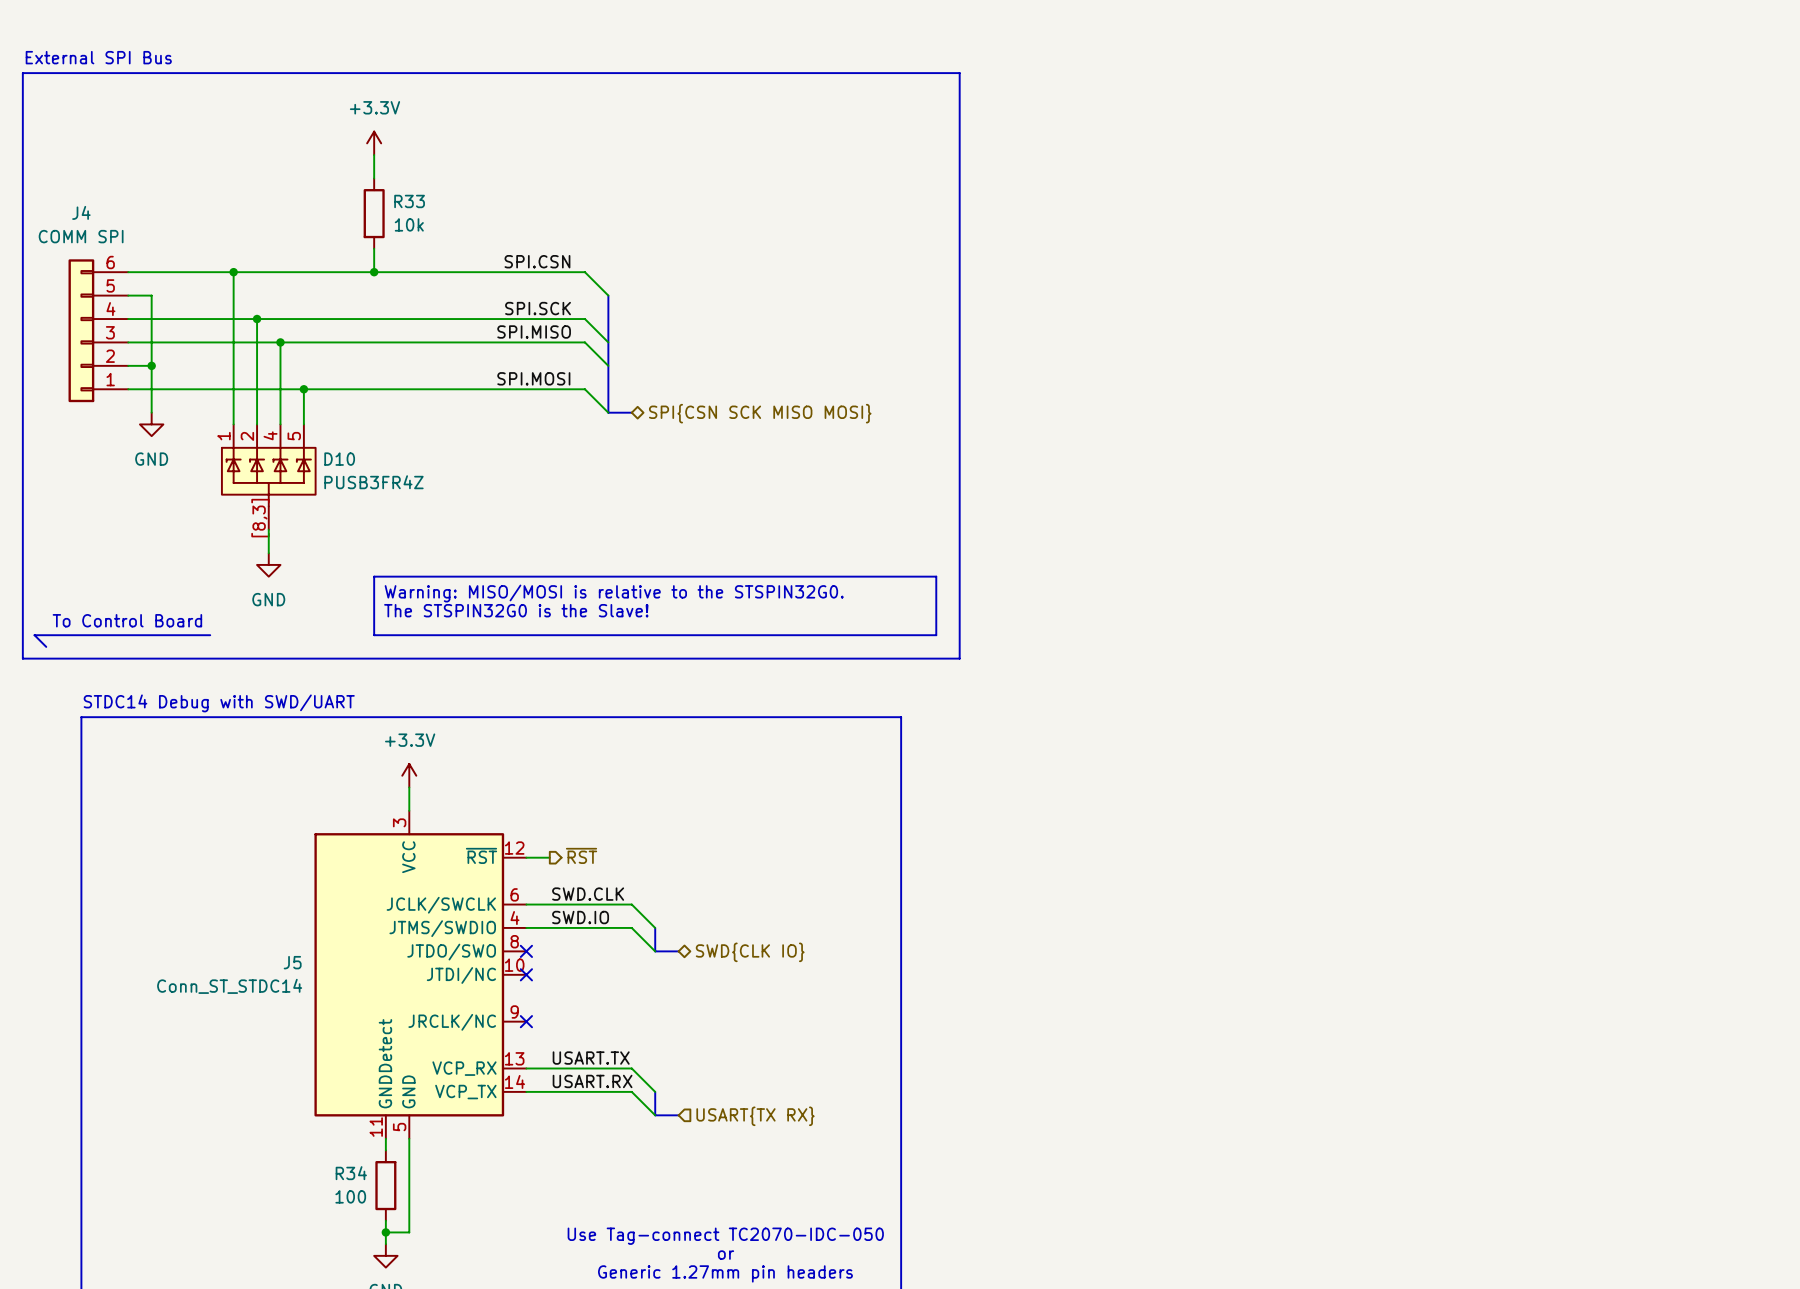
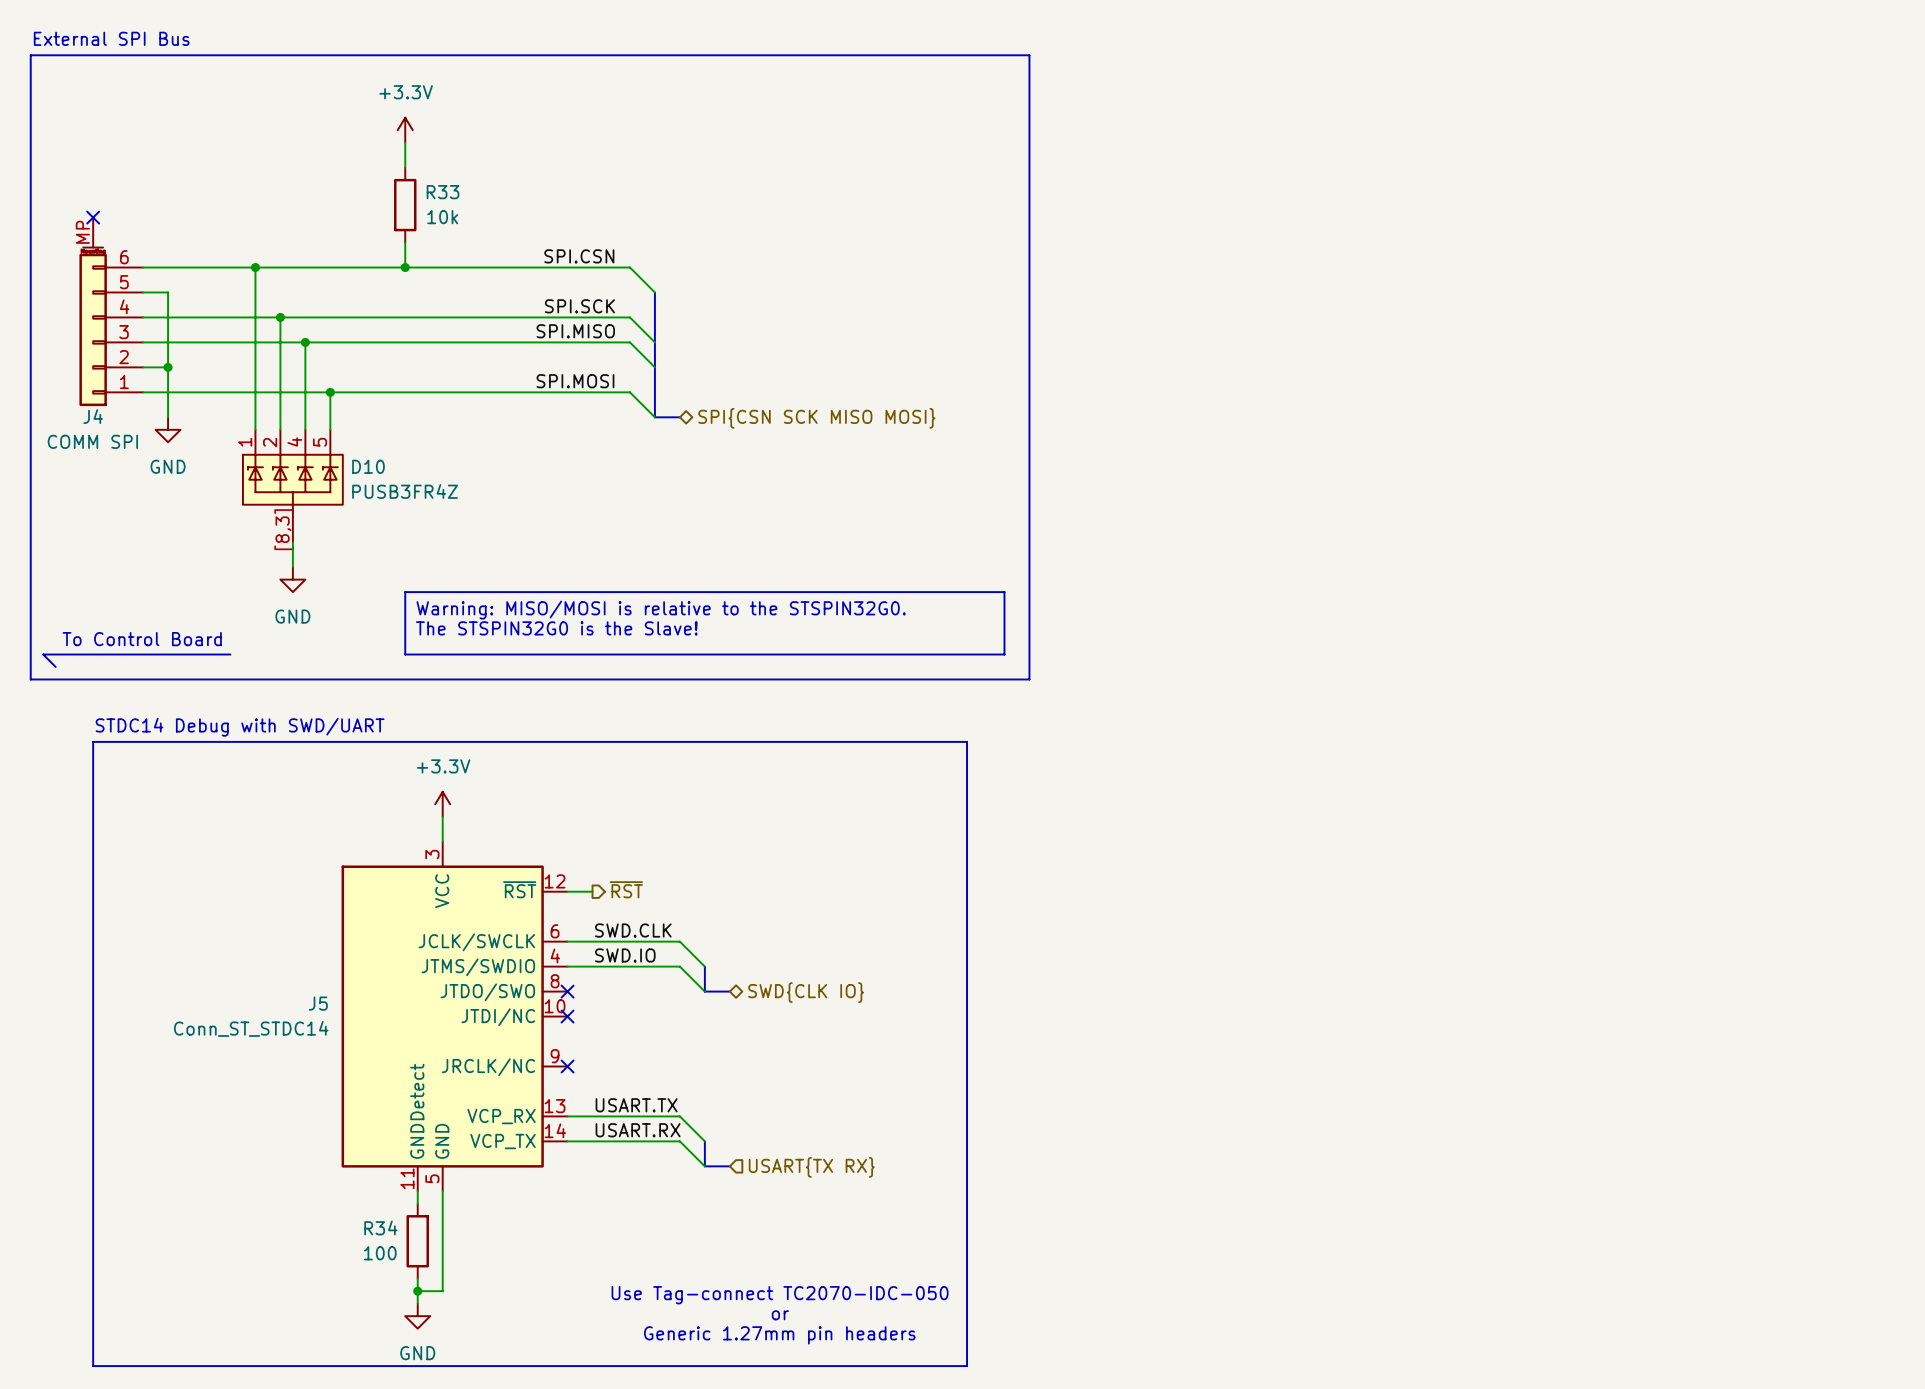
J4 name position: J4 (81, 212) -> J4 (93, 416)
no-connect mark: none -> (93, 217)
J4 value position: COMM SPI (81, 236) -> COMM SPI (92, 441)
J4 symbol: [68, 259, 129, 403] -> [79, 217, 144, 407]

